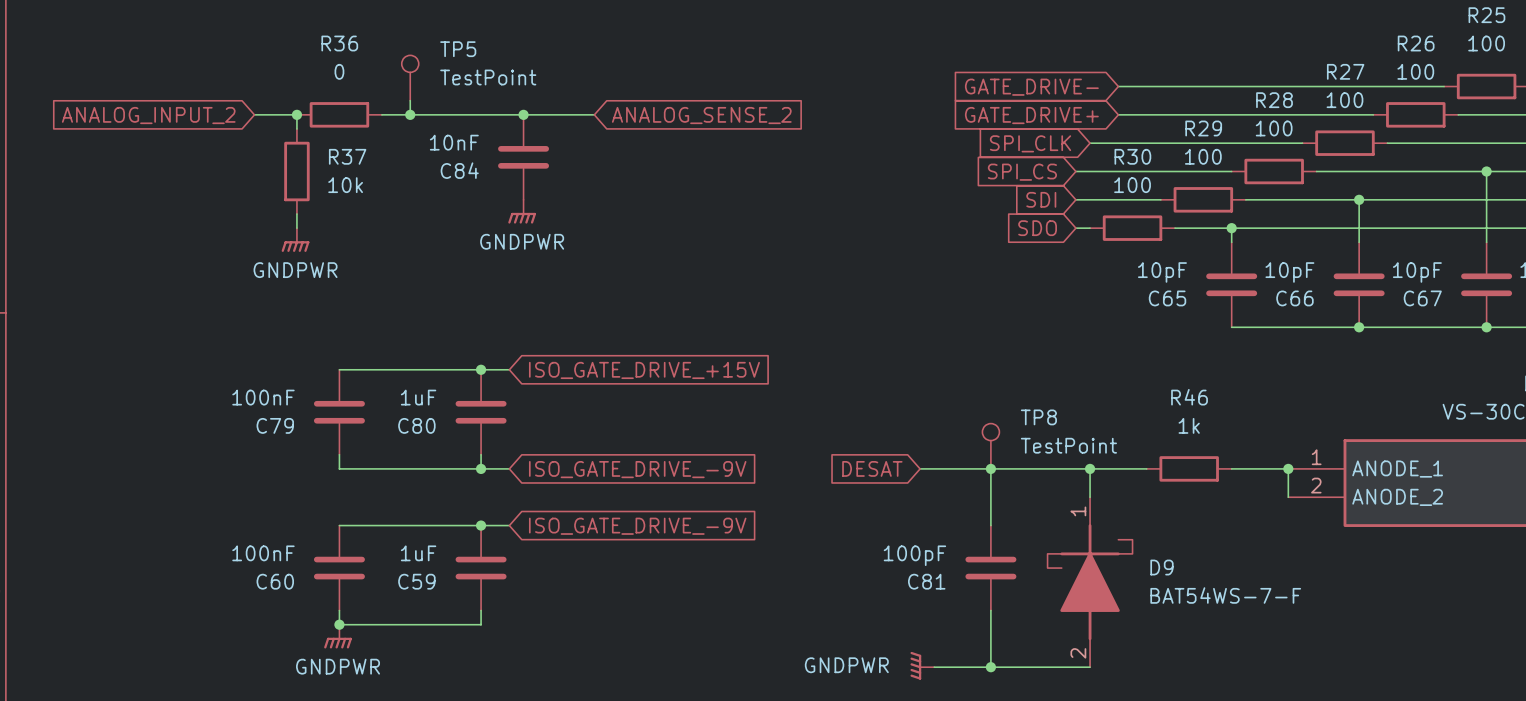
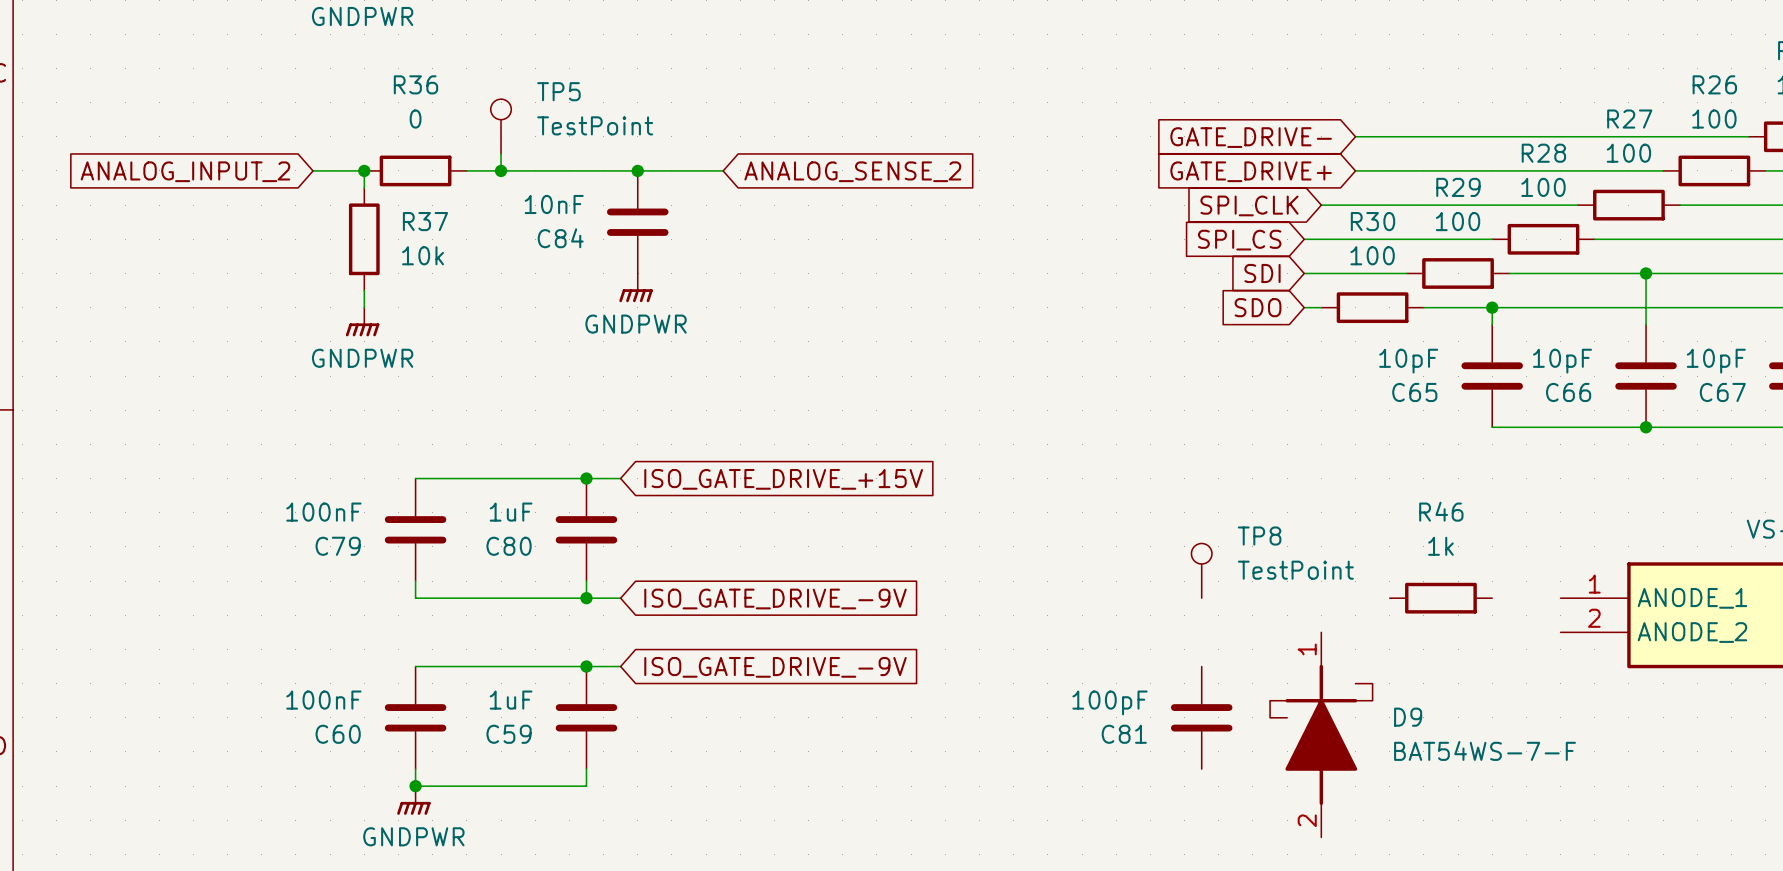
global label: DESAT (872, 468) -> none
wire: (920, 468) (1146, 468) -> none
wire: (990, 468) (990, 525) -> none
junction: (990, 468) -> none
wire: (1090, 468) (1090, 497) -> none
junction: (1090, 468) -> none
wire: (1231, 468) (1288, 468) (1288, 497) -> none
junction: (1288, 468) -> none
wire: (990, 610) (990, 667) -> none
power symbol: GNDPWR (922, 665) -> none
wire: (934, 667) (1090, 667) -> none
junction: (990, 667) -> none

